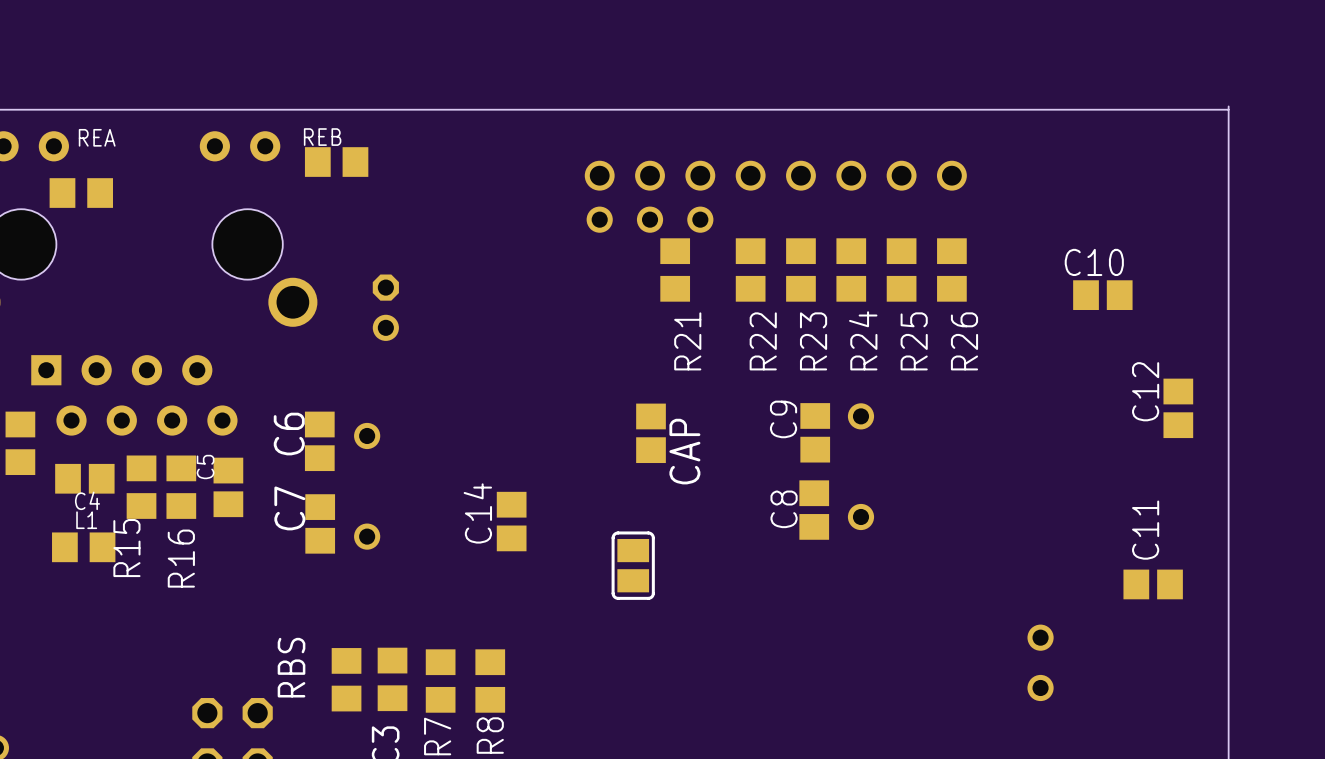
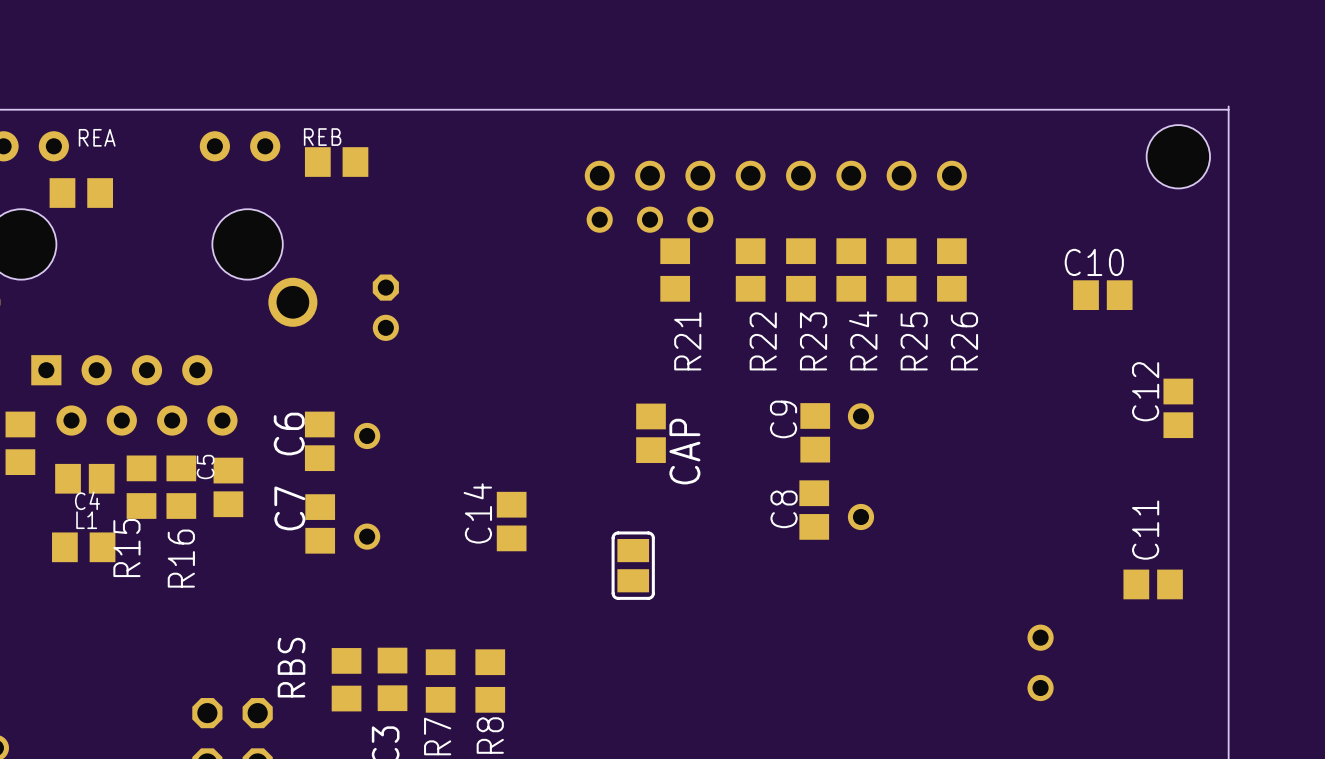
hole: none -> (1178, 156)

